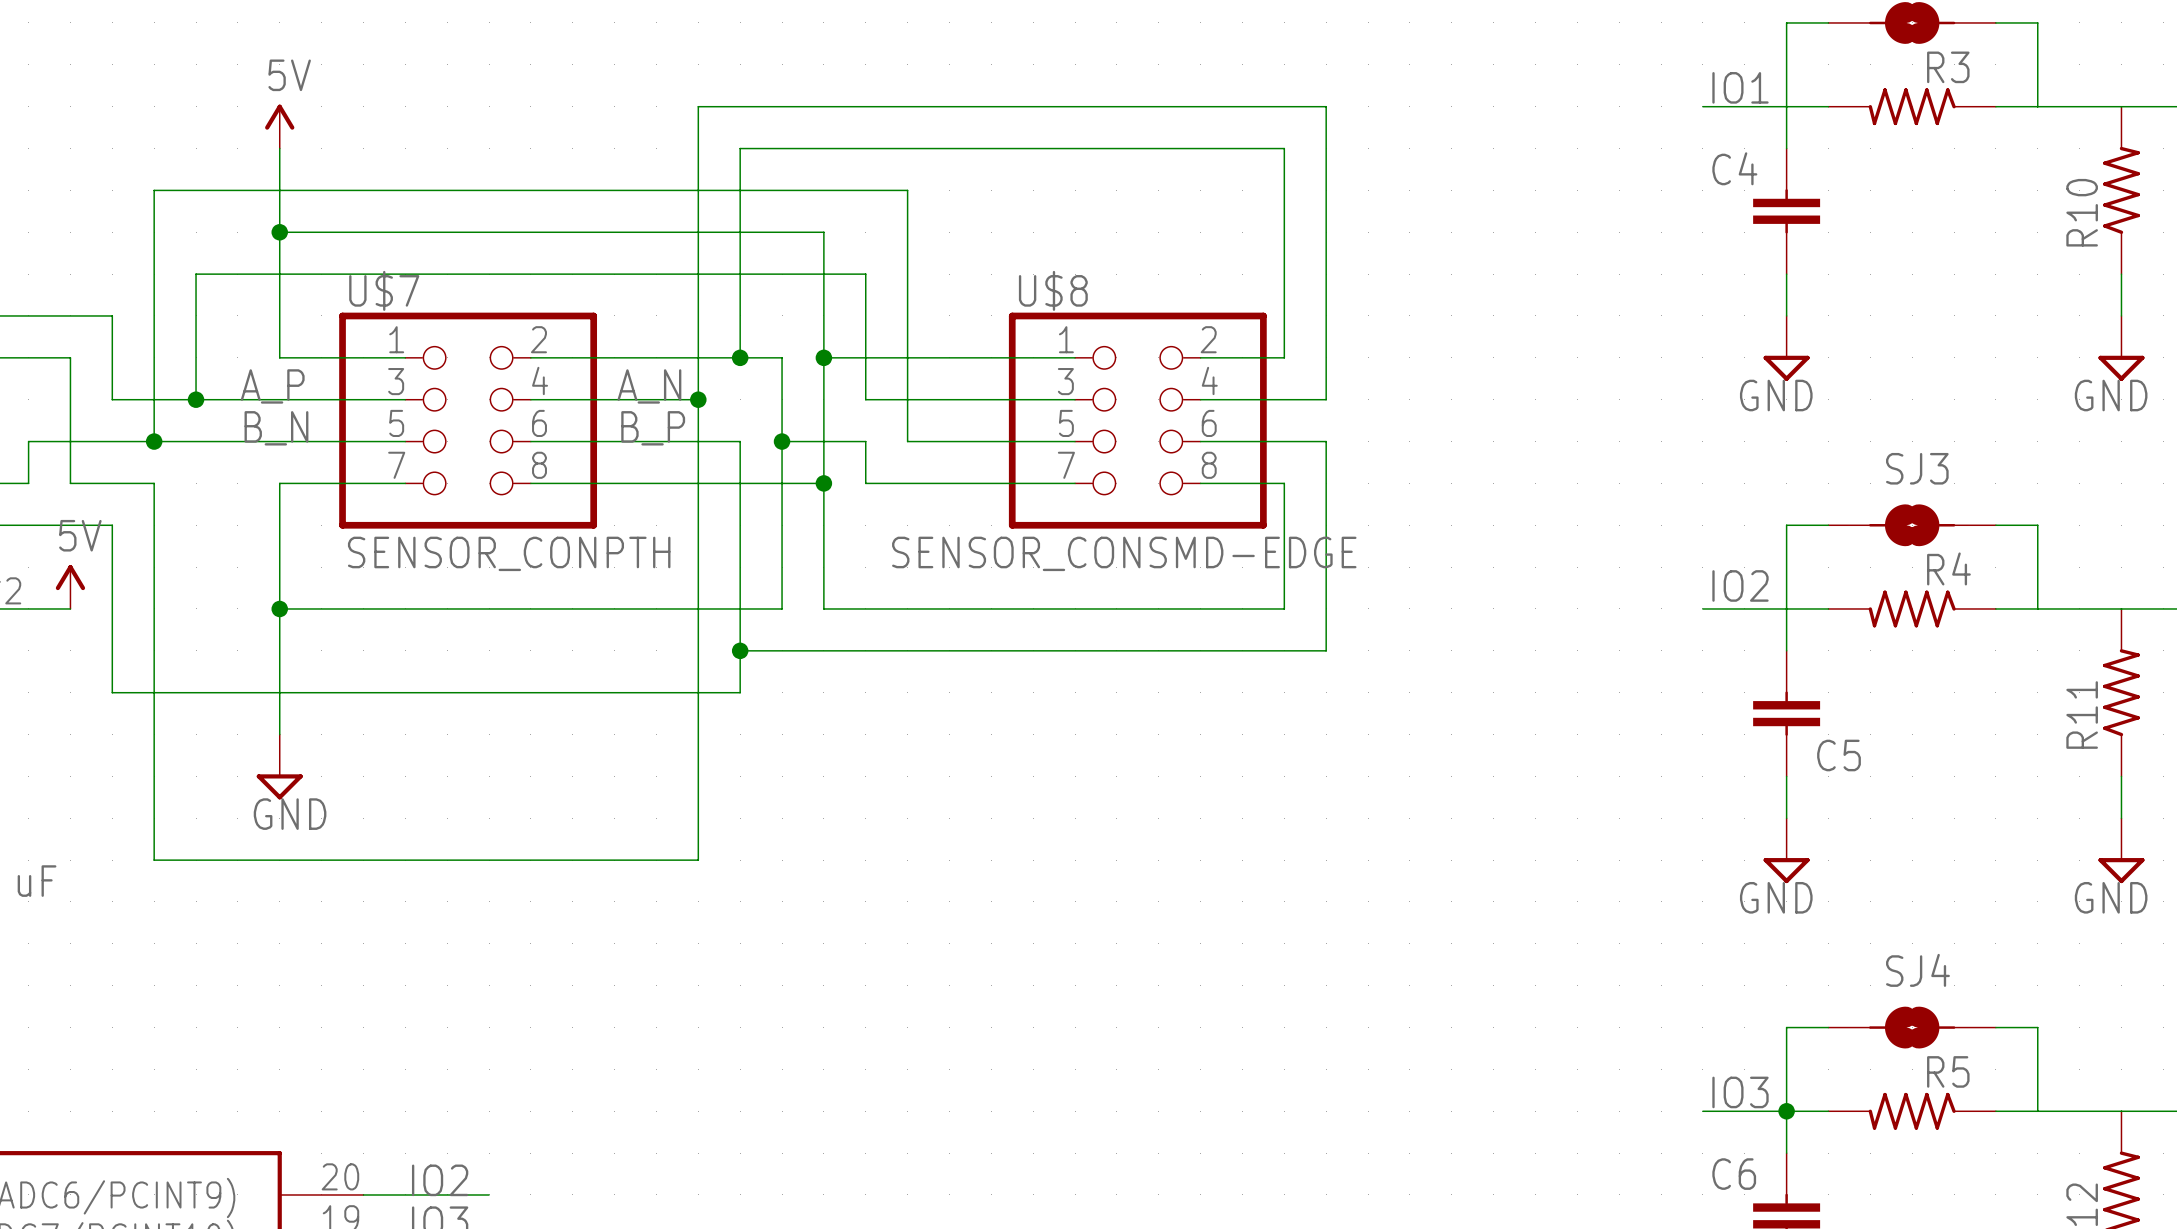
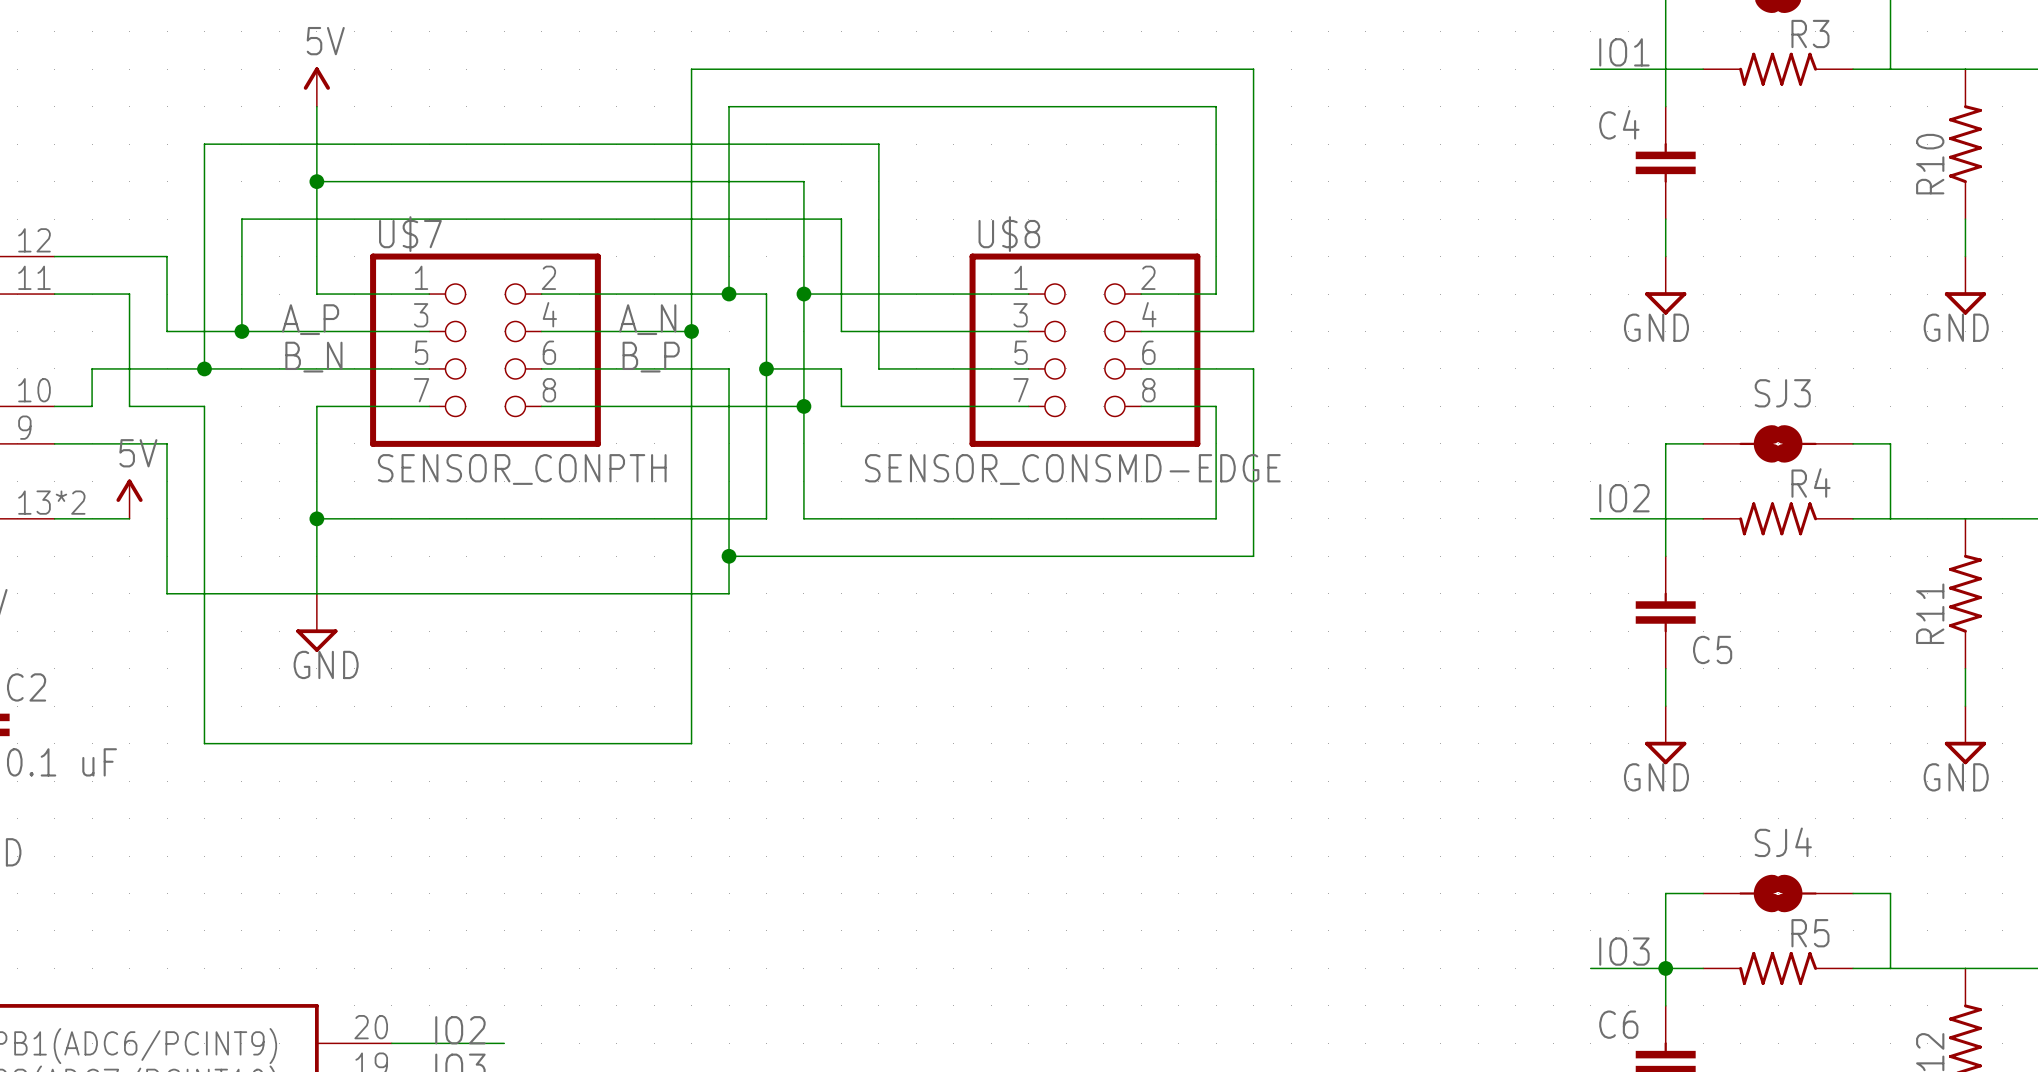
power symbol position: GND (279, 767) -> GND (316, 622)

